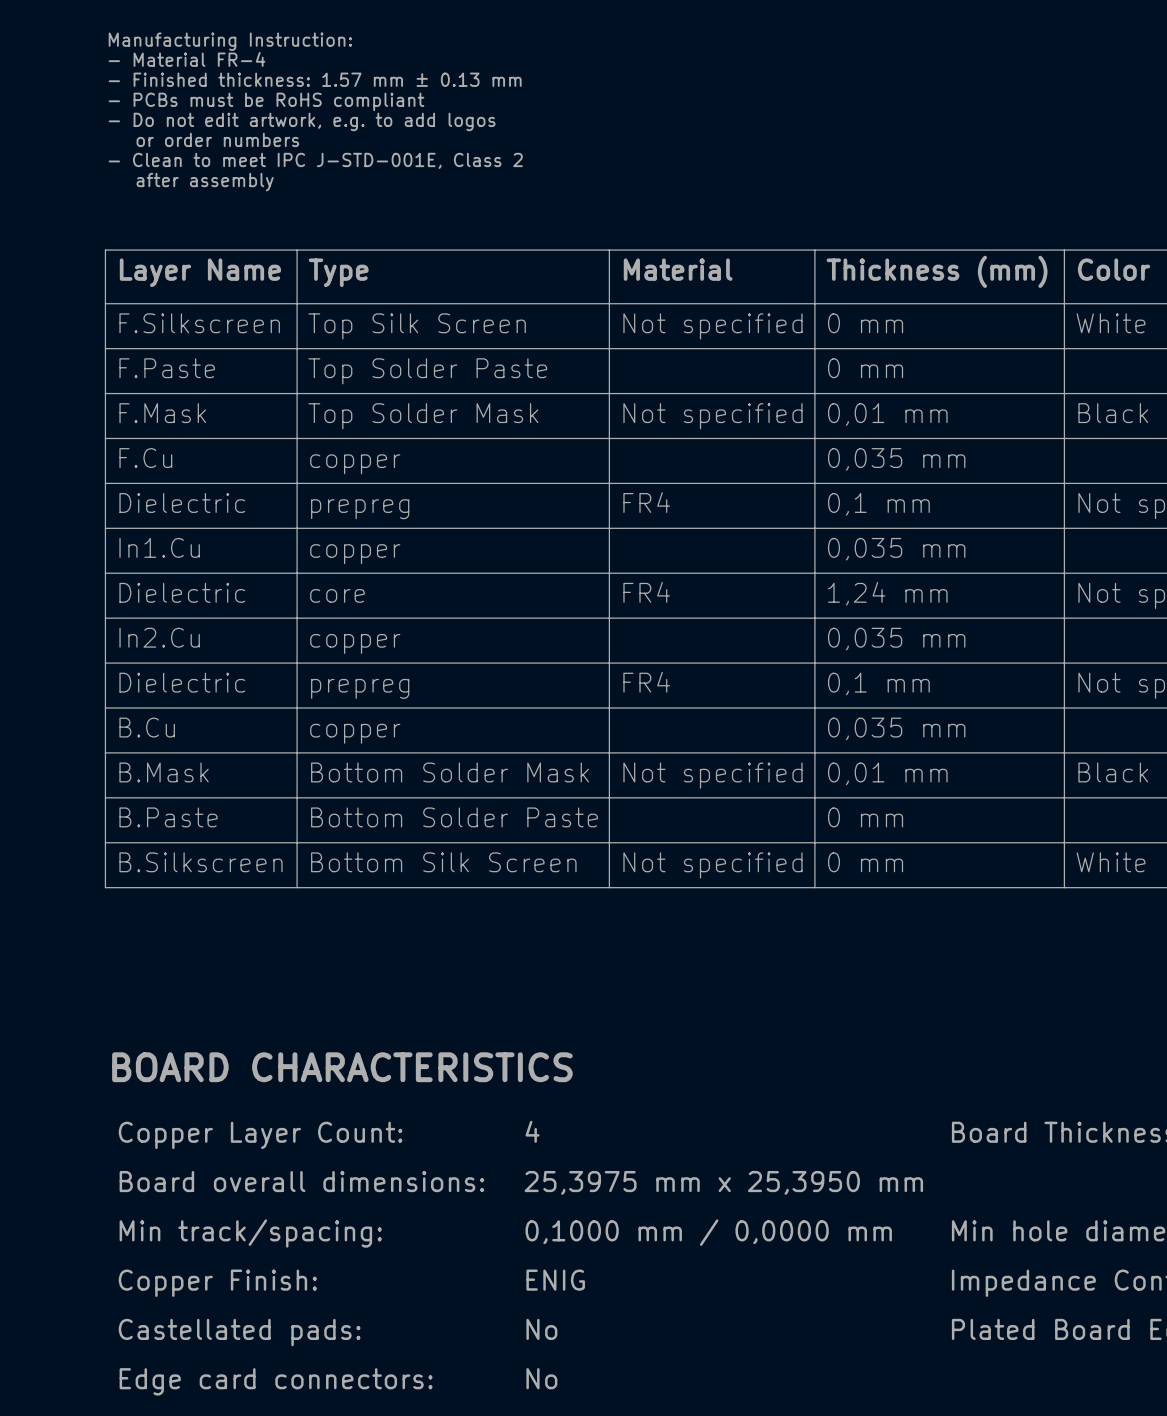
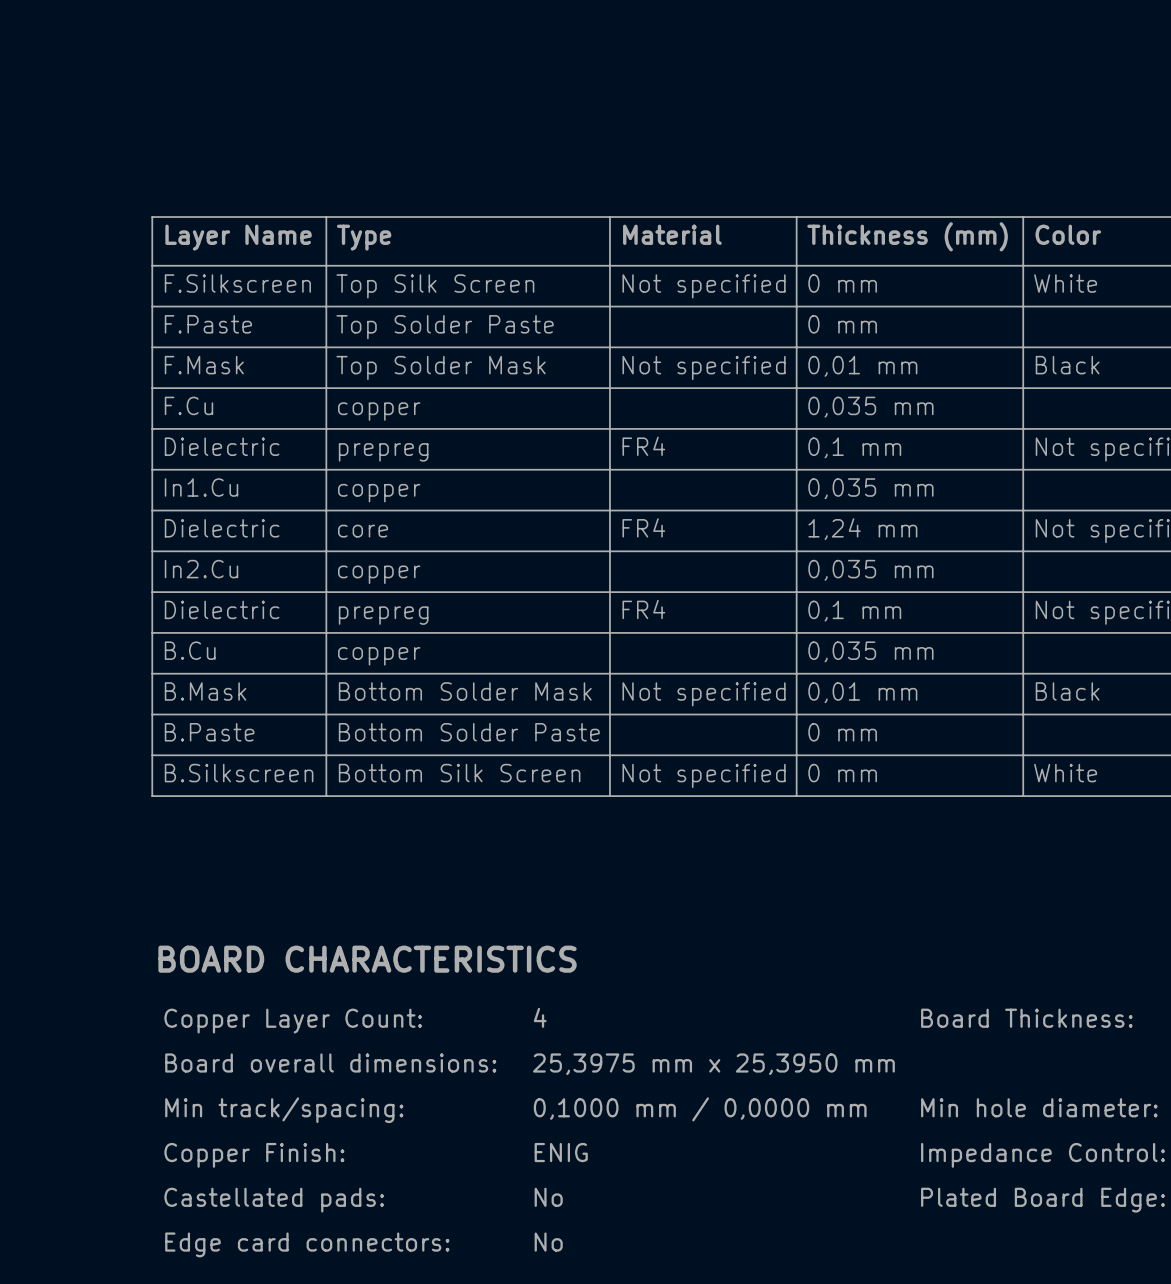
text: Manufacturing Instruction: (230, 41) -> none
text: - Material FR-4 (187, 59) -> none
text: - Finished thickness: 1.57 mm ± 0.13 mm (315, 79) -> none
text: - PCBs must be RoHS compliant (266, 101) -> none
text: - Do not edit artwork, e.g. to add logos (302, 121) -> none
text: or order numbers (217, 139) -> none
text: - Clean to meet IPC J-STD-001E, Class 2 (315, 160) -> none
text: after assembly (205, 182) -> none

